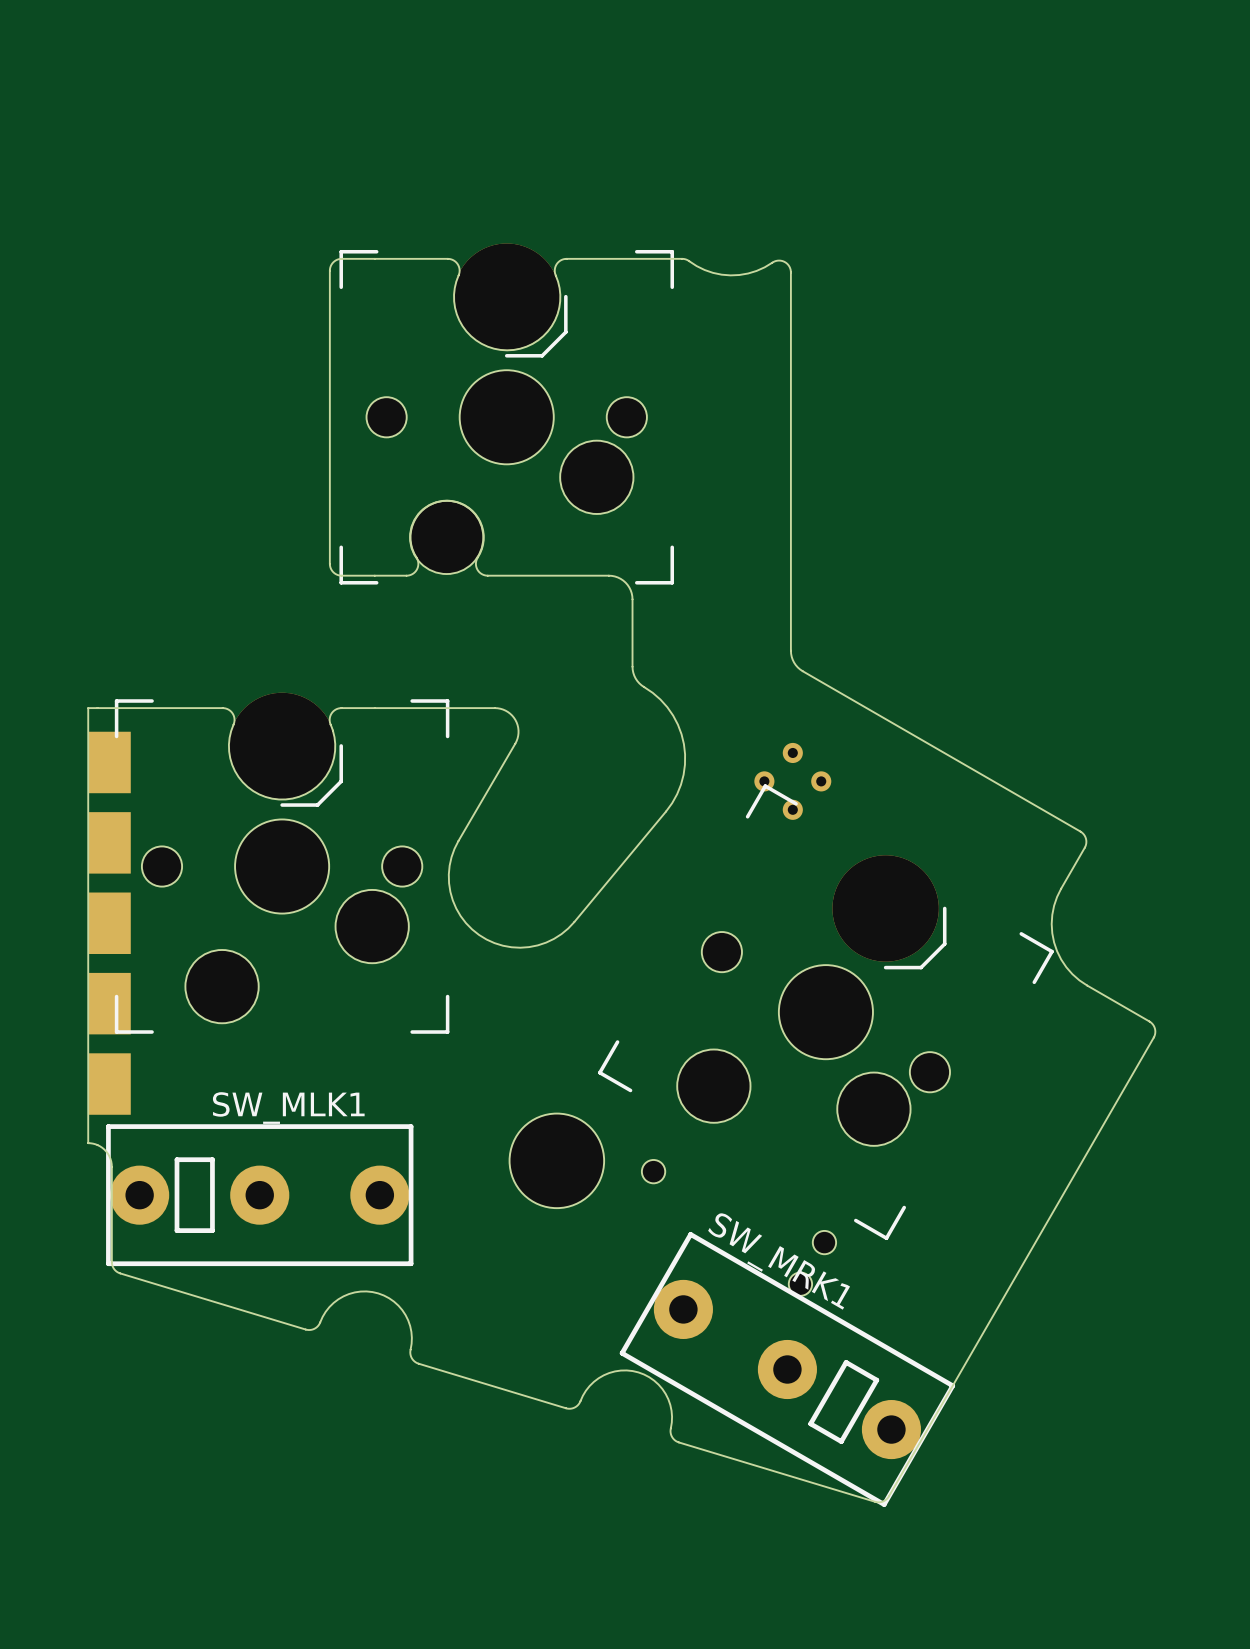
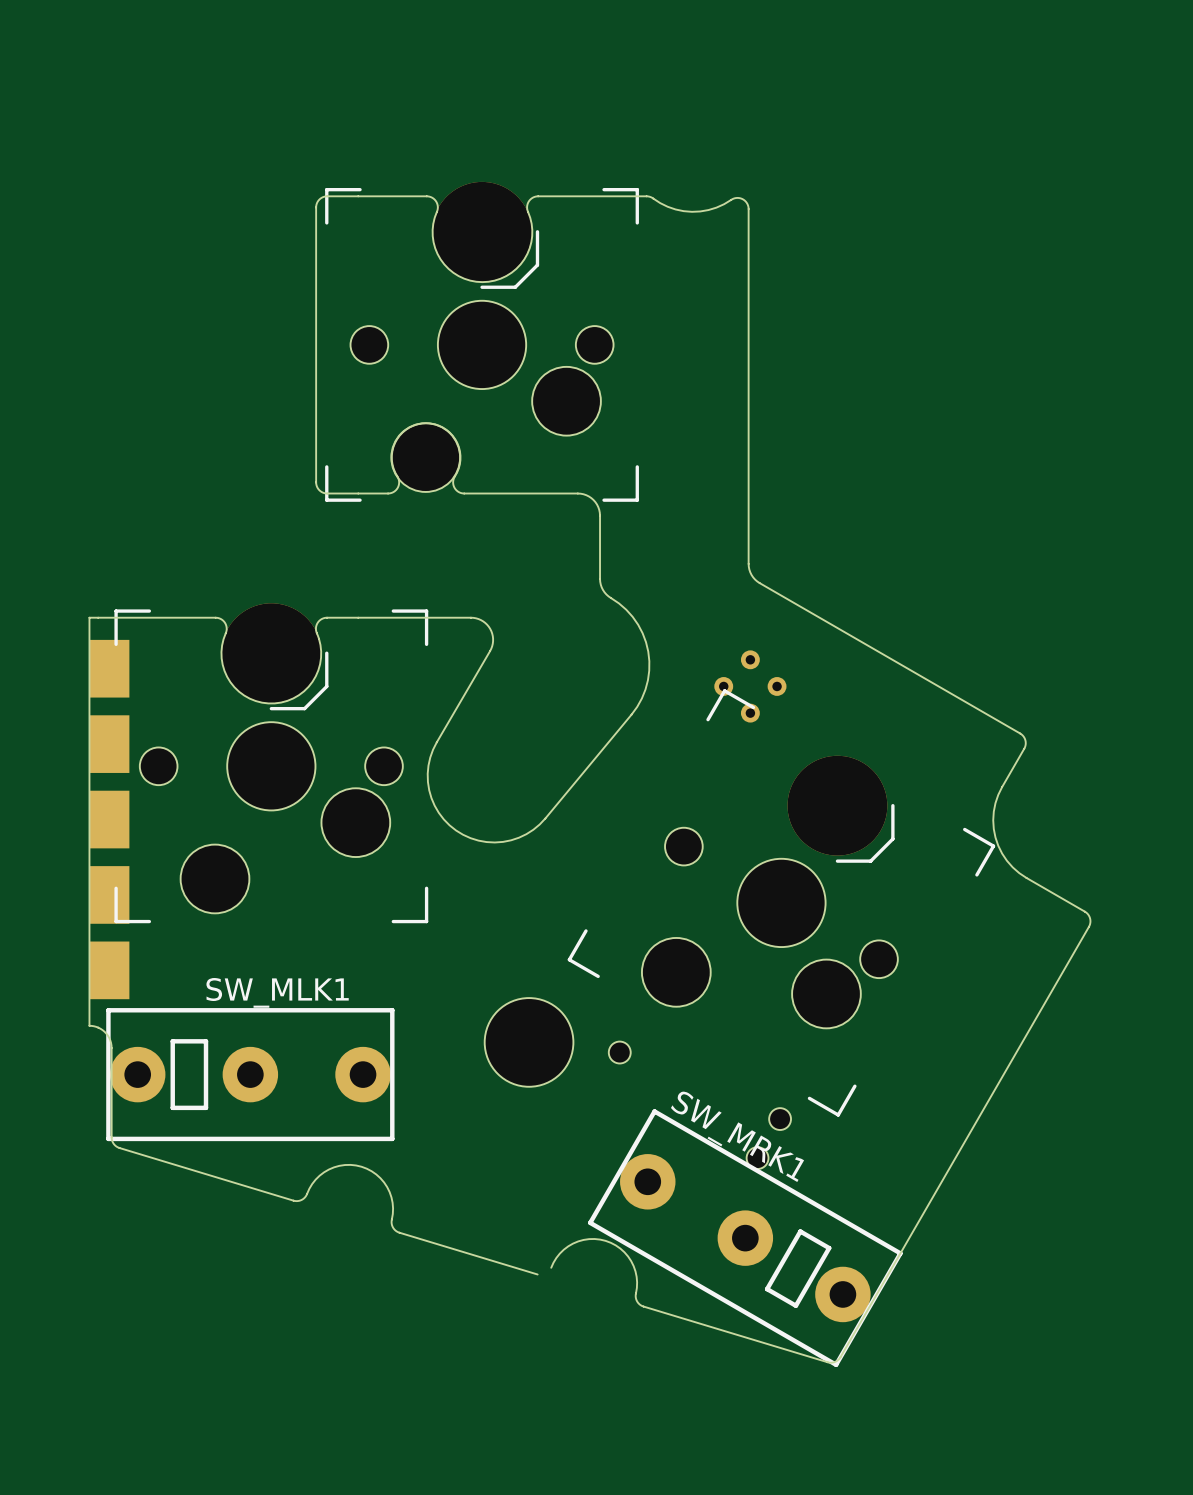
board edge: (580, 1401) (574, 1407) (566, 1408) -> none

